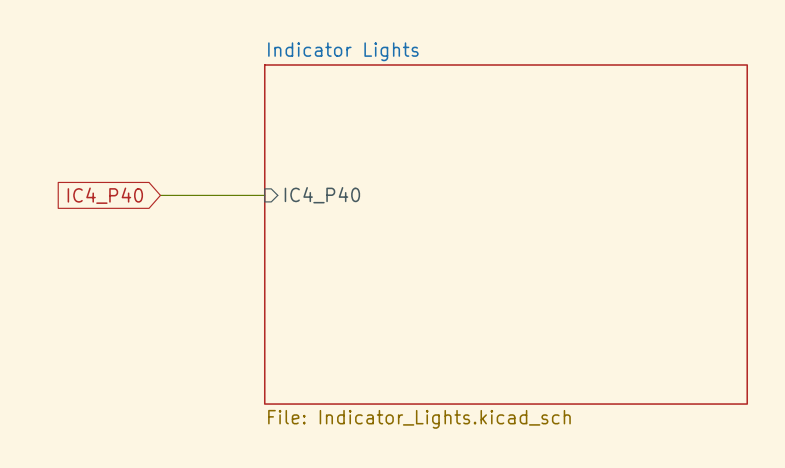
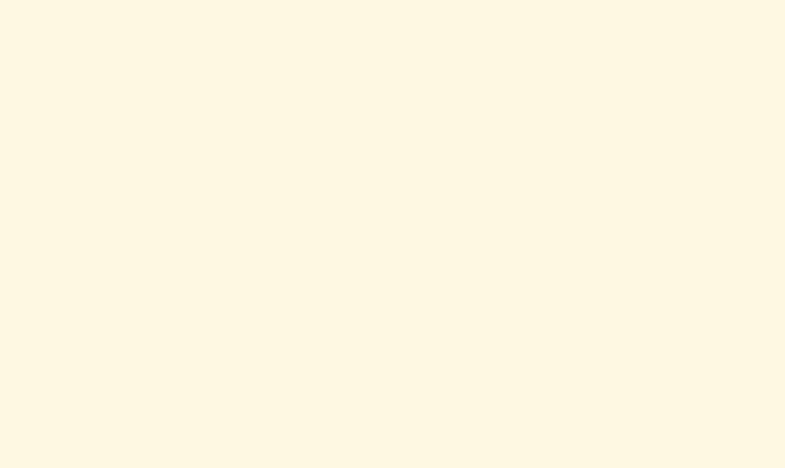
global label: IC4_P40 (105, 195) -> none
wire: (160, 195) (264, 195) -> none
sheet pin: IC4_P40 (322, 195) -> none
sheet Indicator Lights: File: Indicator_Lights.kicad_sch (505, 234) -> none

